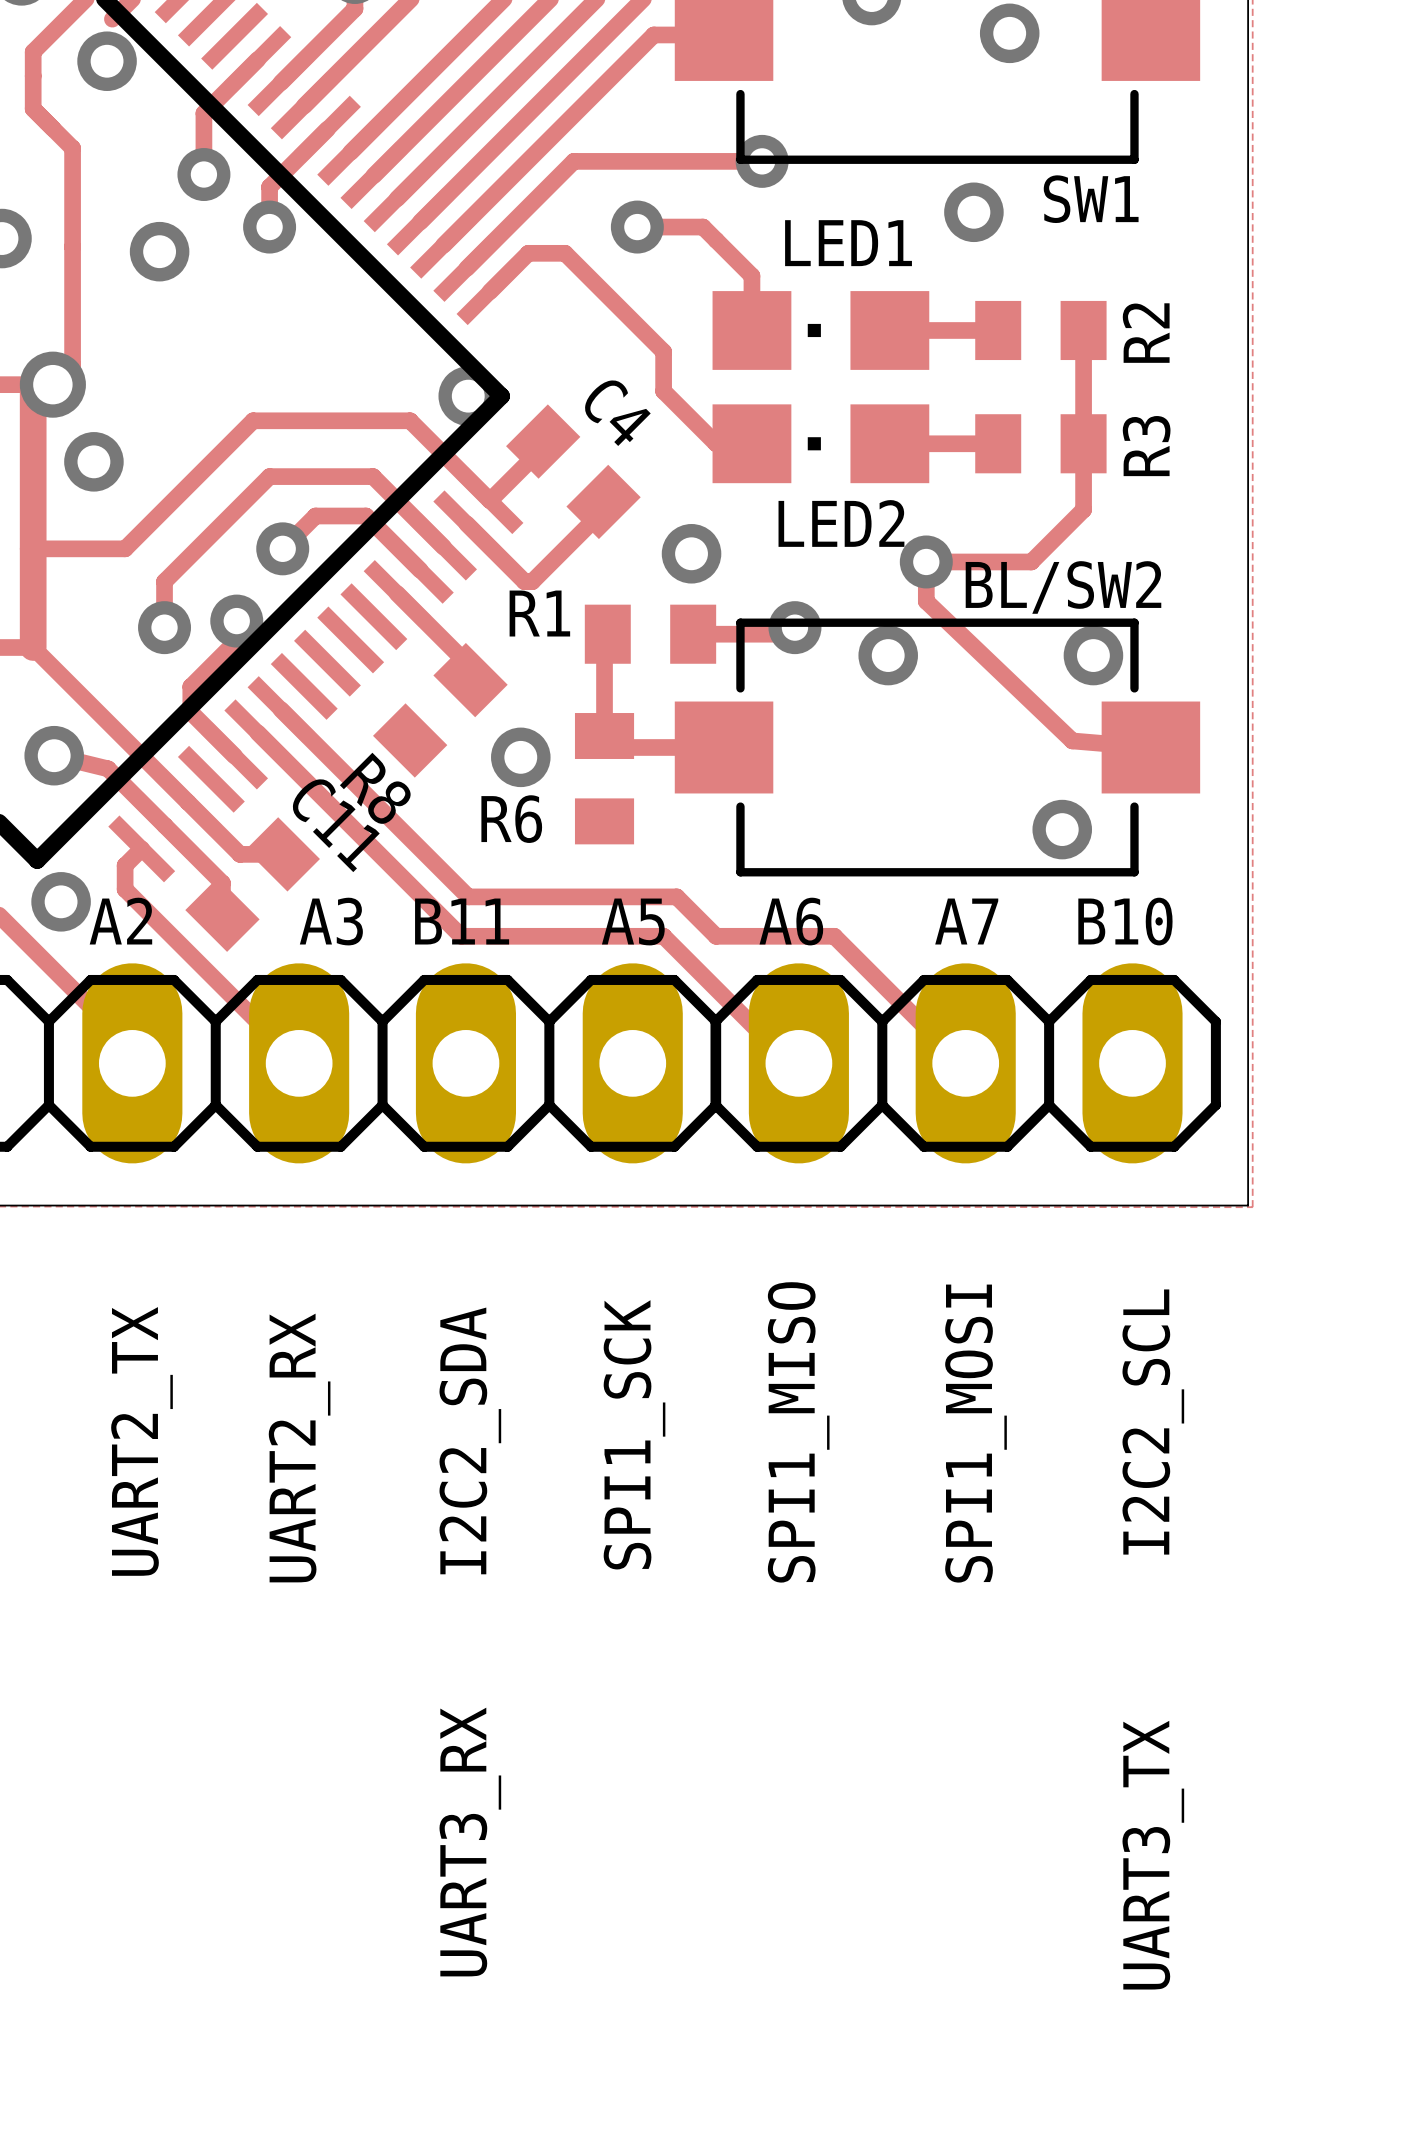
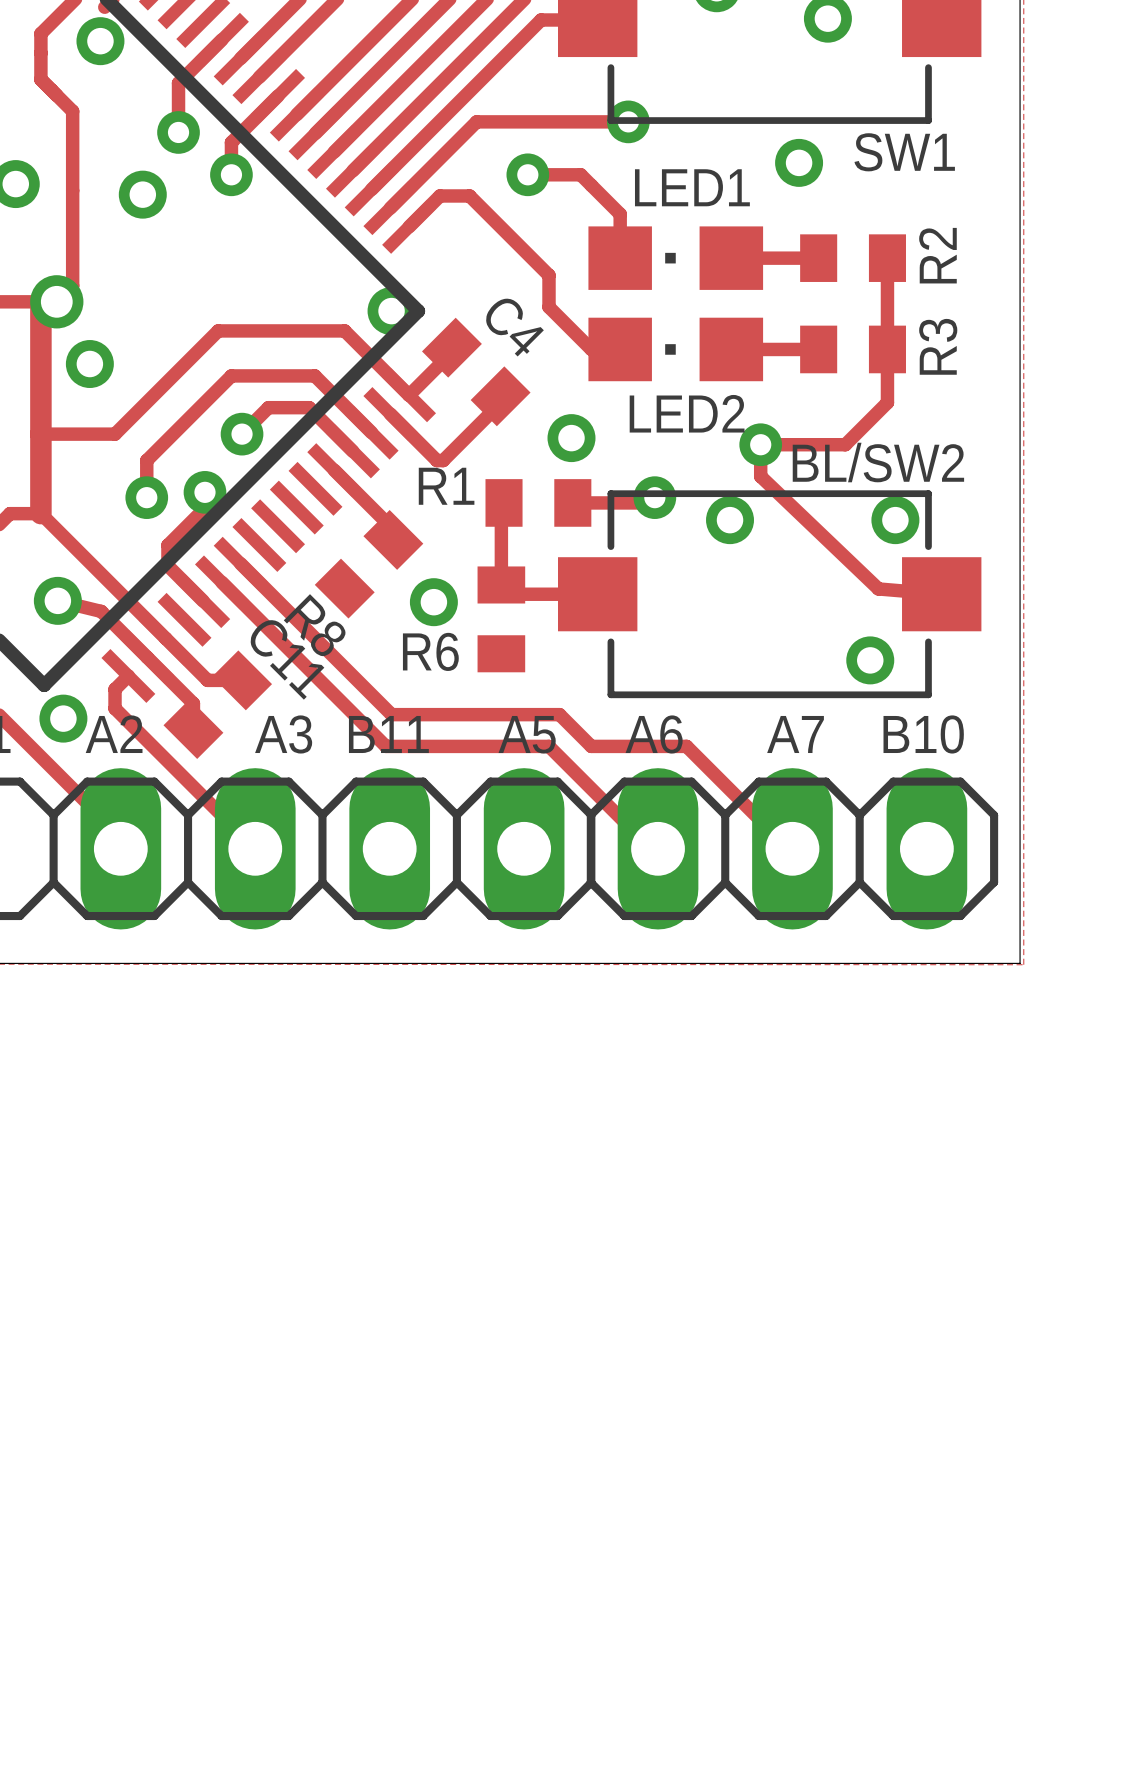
text: I2C2_SCL (1153, 1422) -> none
text: SPI1_MISO (798, 1432) -> none
text: SPI1_MOSI (976, 1433) -> none
text: SPI1_SCK (634, 1434) -> none
text: I2C2_SDA (470, 1440) -> none
text: UART2_TX (141, 1441) -> none
text: UART2_RX (299, 1448) -> none
text: UART3_RX (470, 1842) -> none
text: UART3_TX (1153, 1855) -> none

